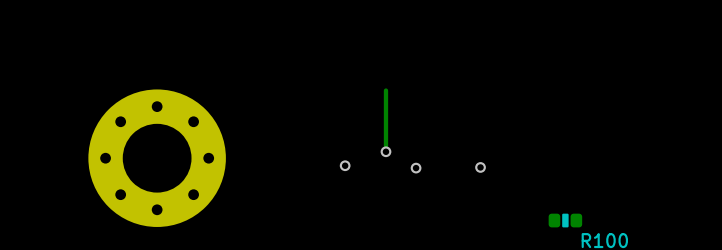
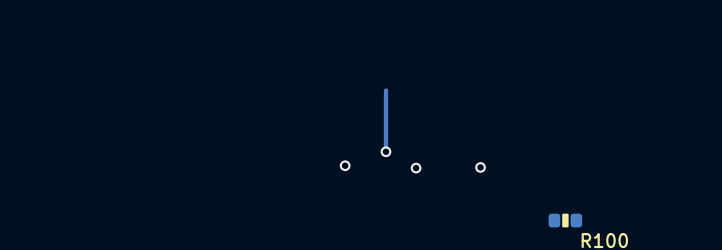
part: (157, 158) -> none

